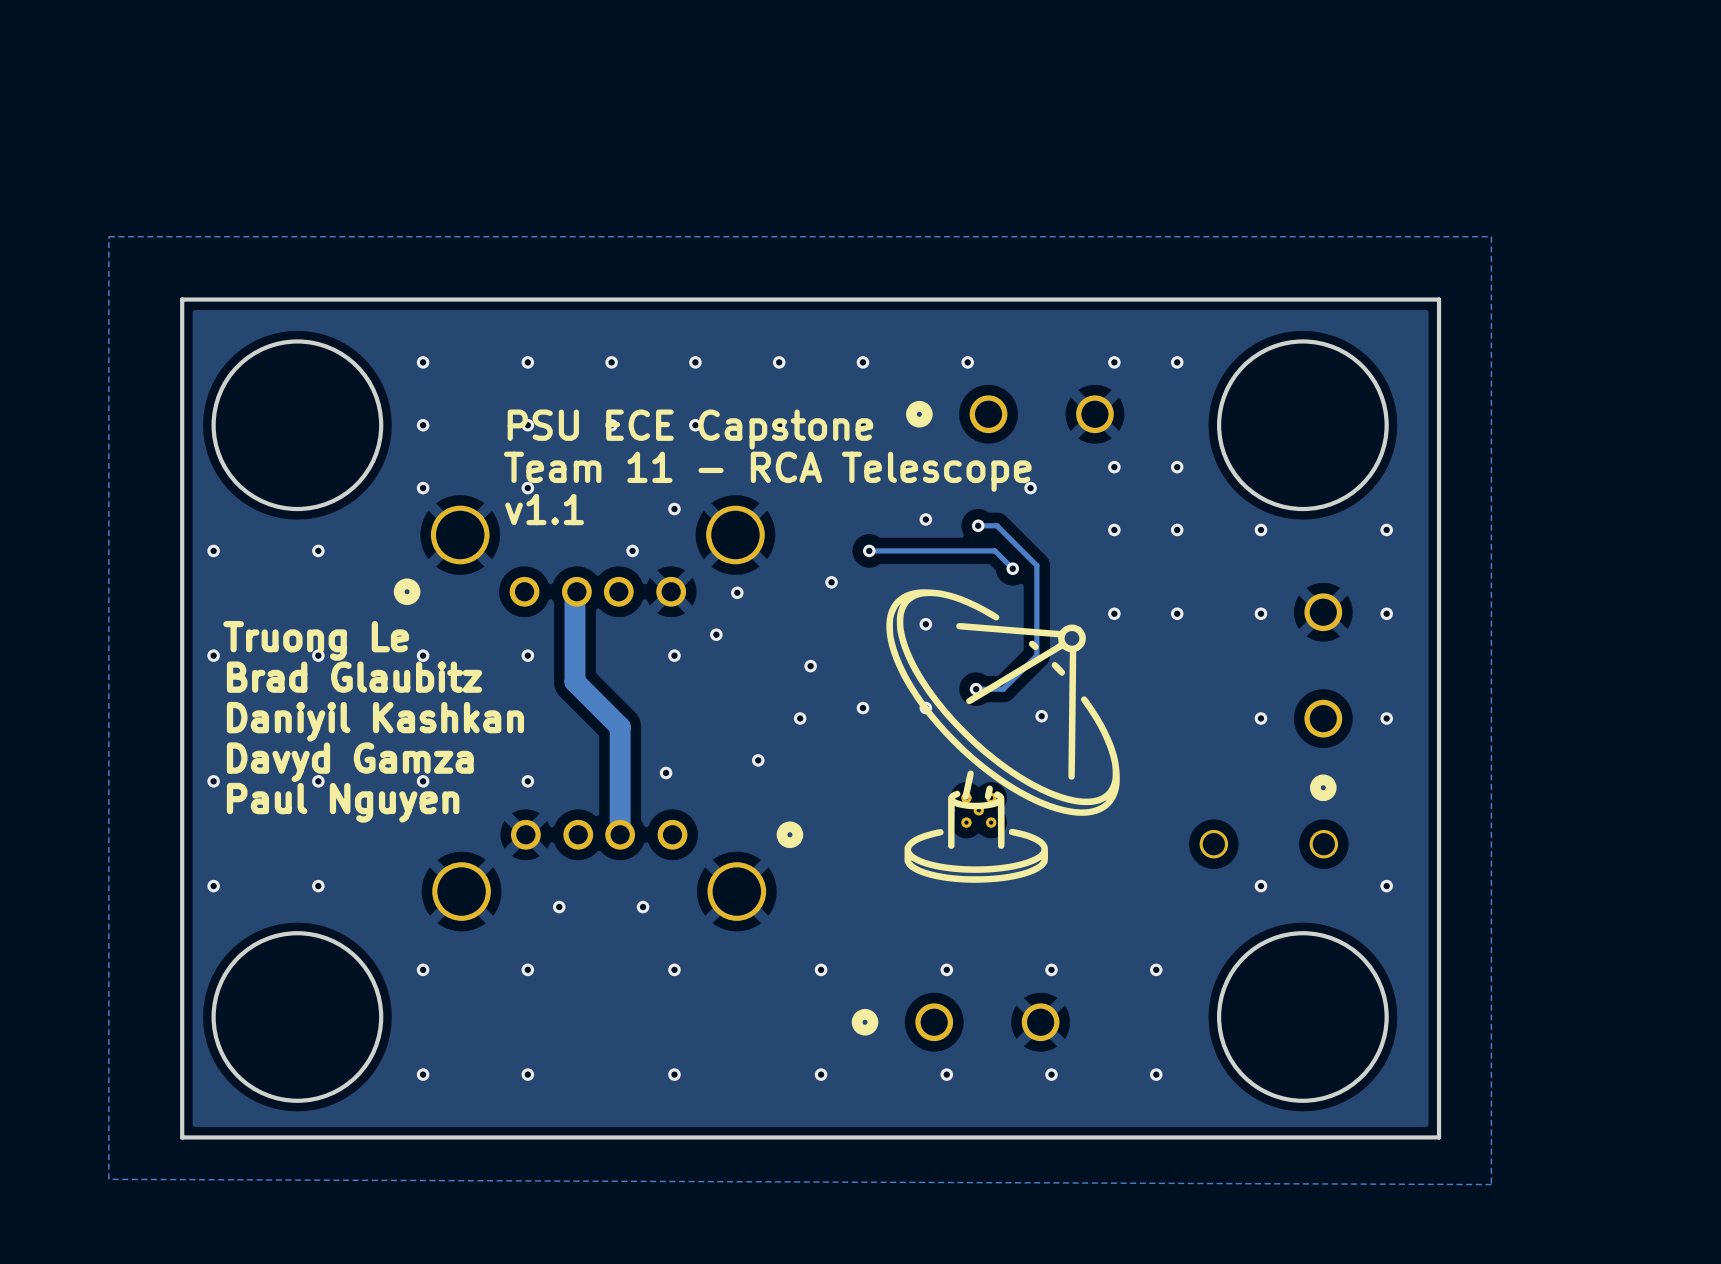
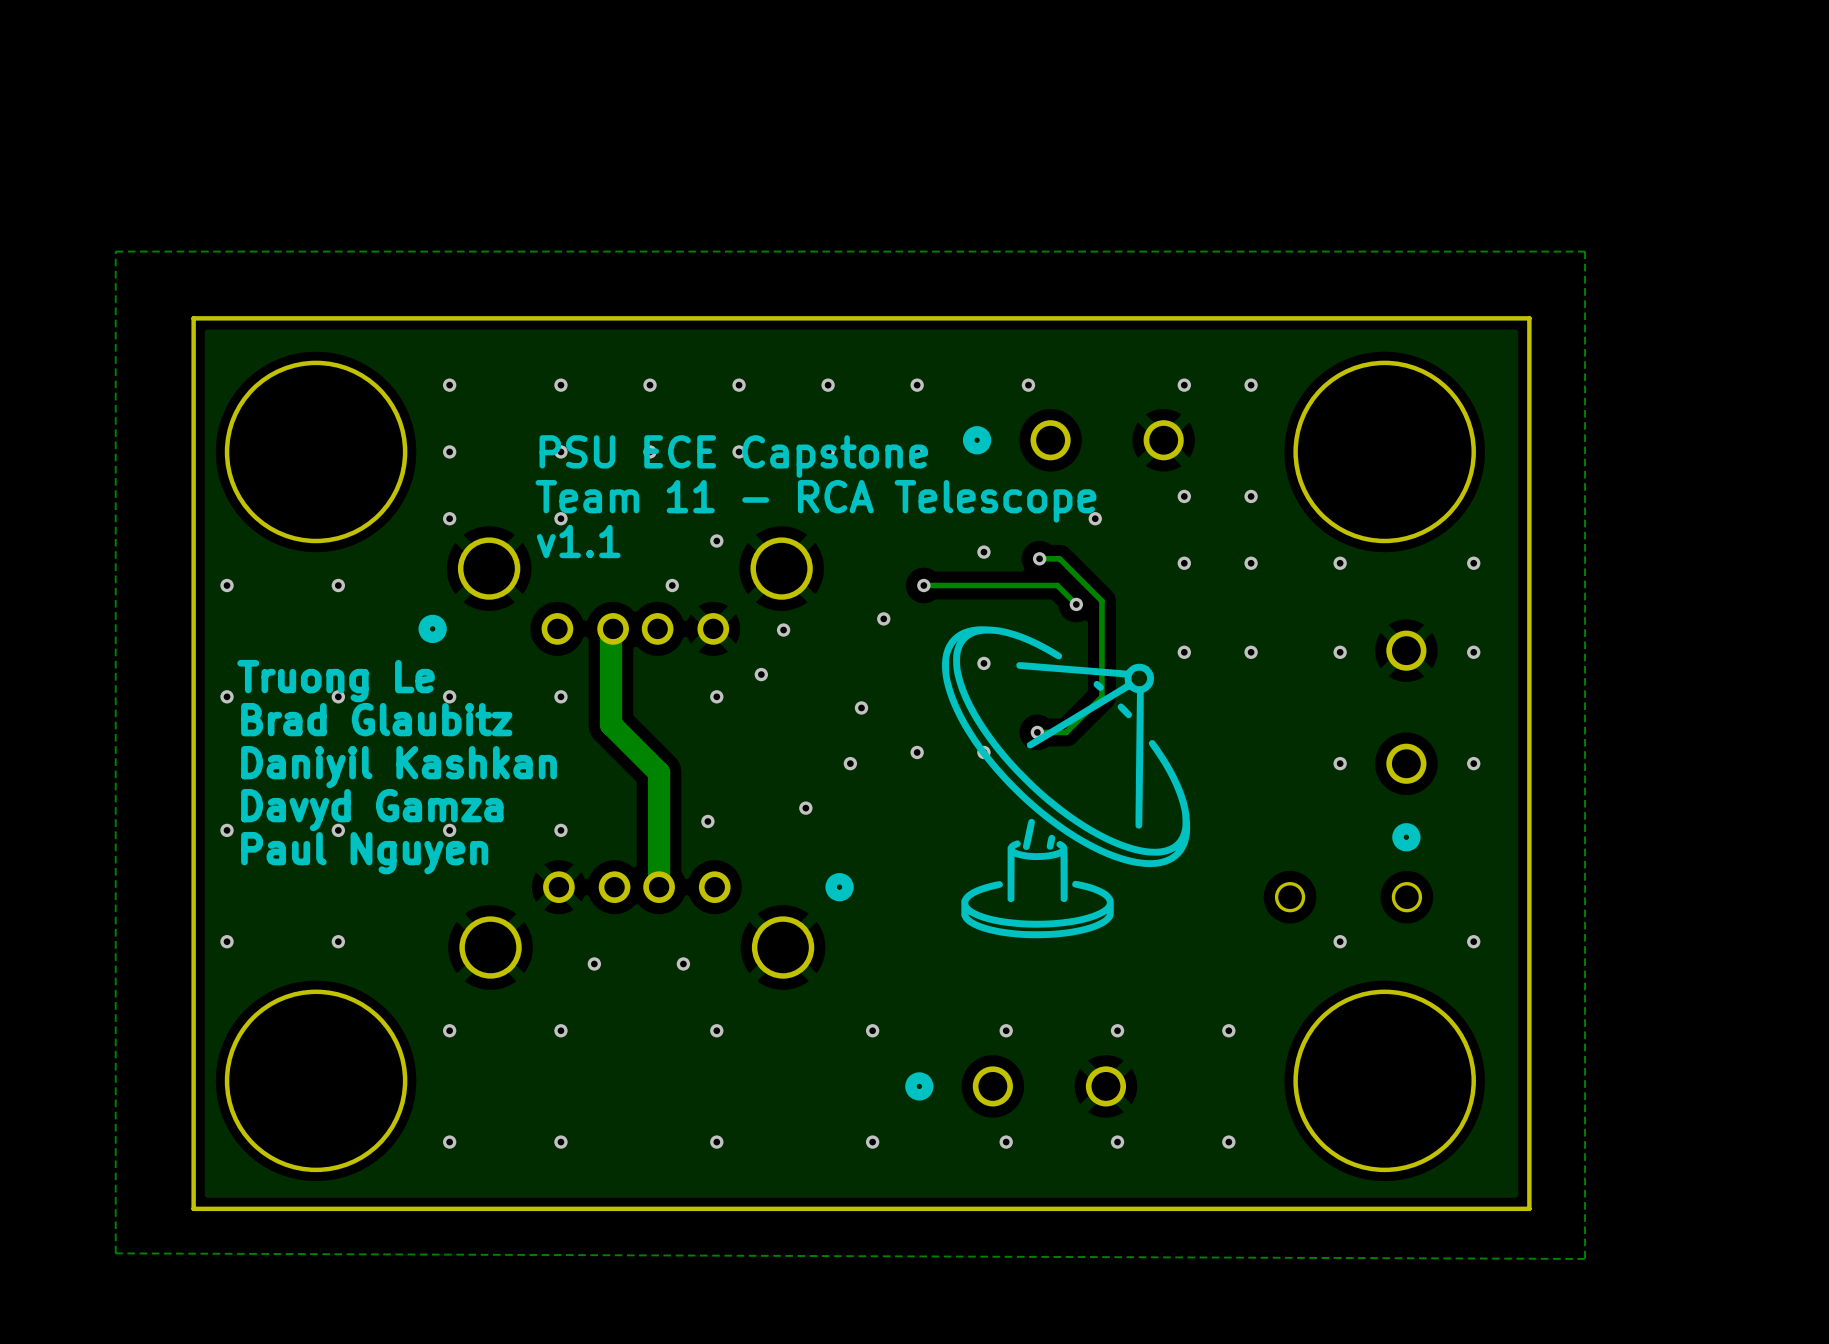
via: (1041, 716) -> none
part: (978, 810) -> none

